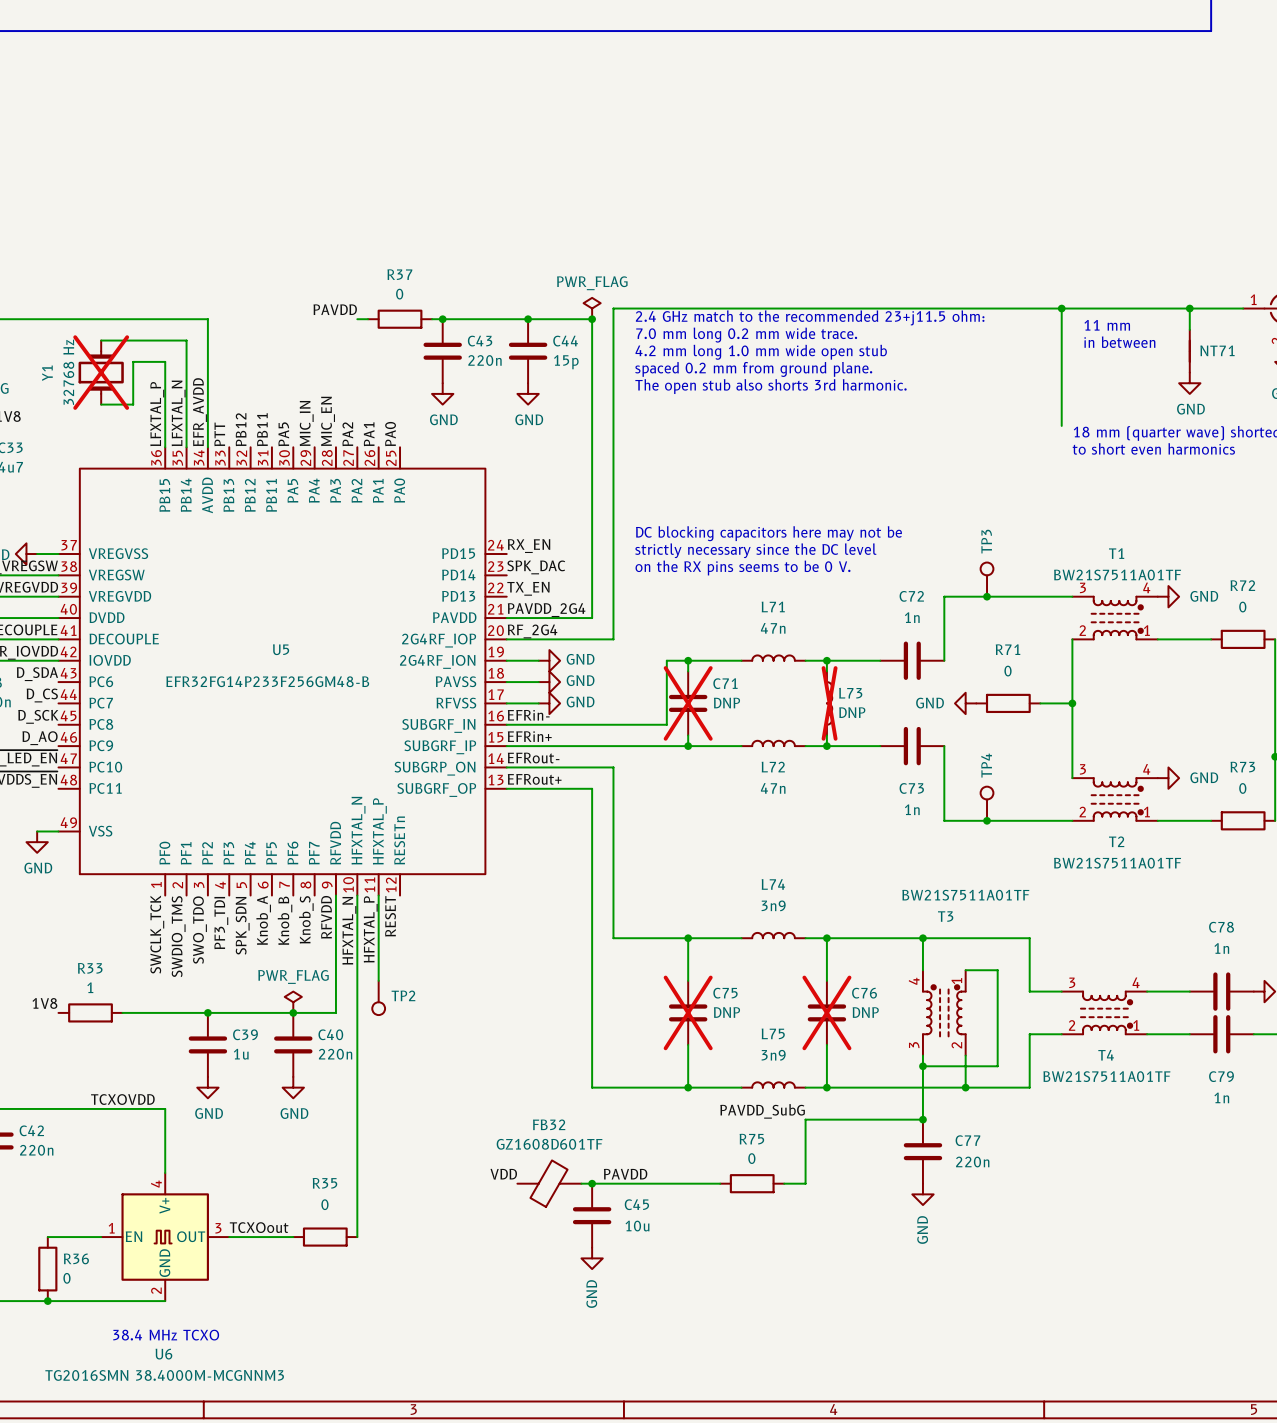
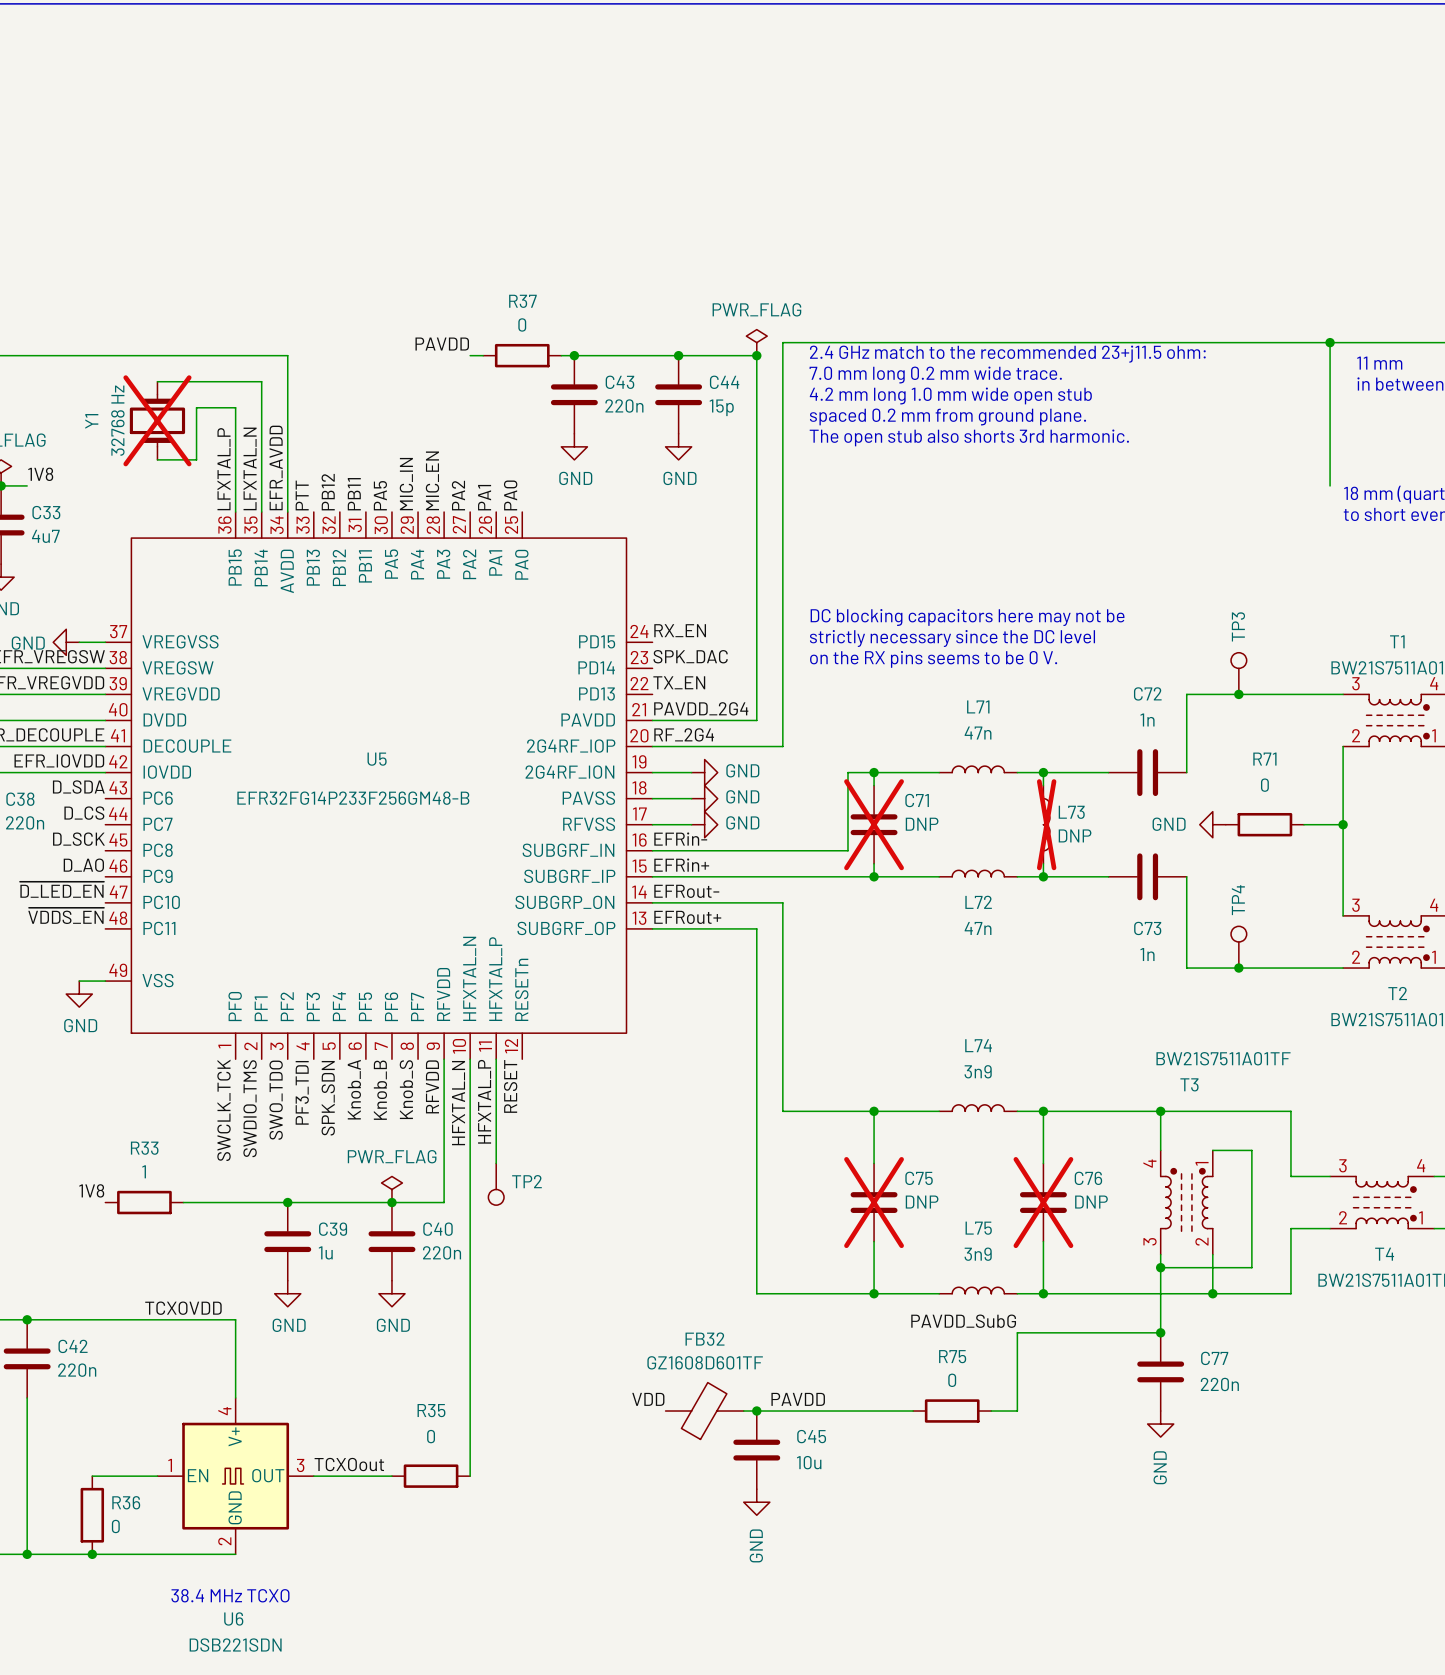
U6 value: TG2016SMN 38.4000M-MCGNNM3 (164, 1375) -> DSB221SDN (235, 1645)

